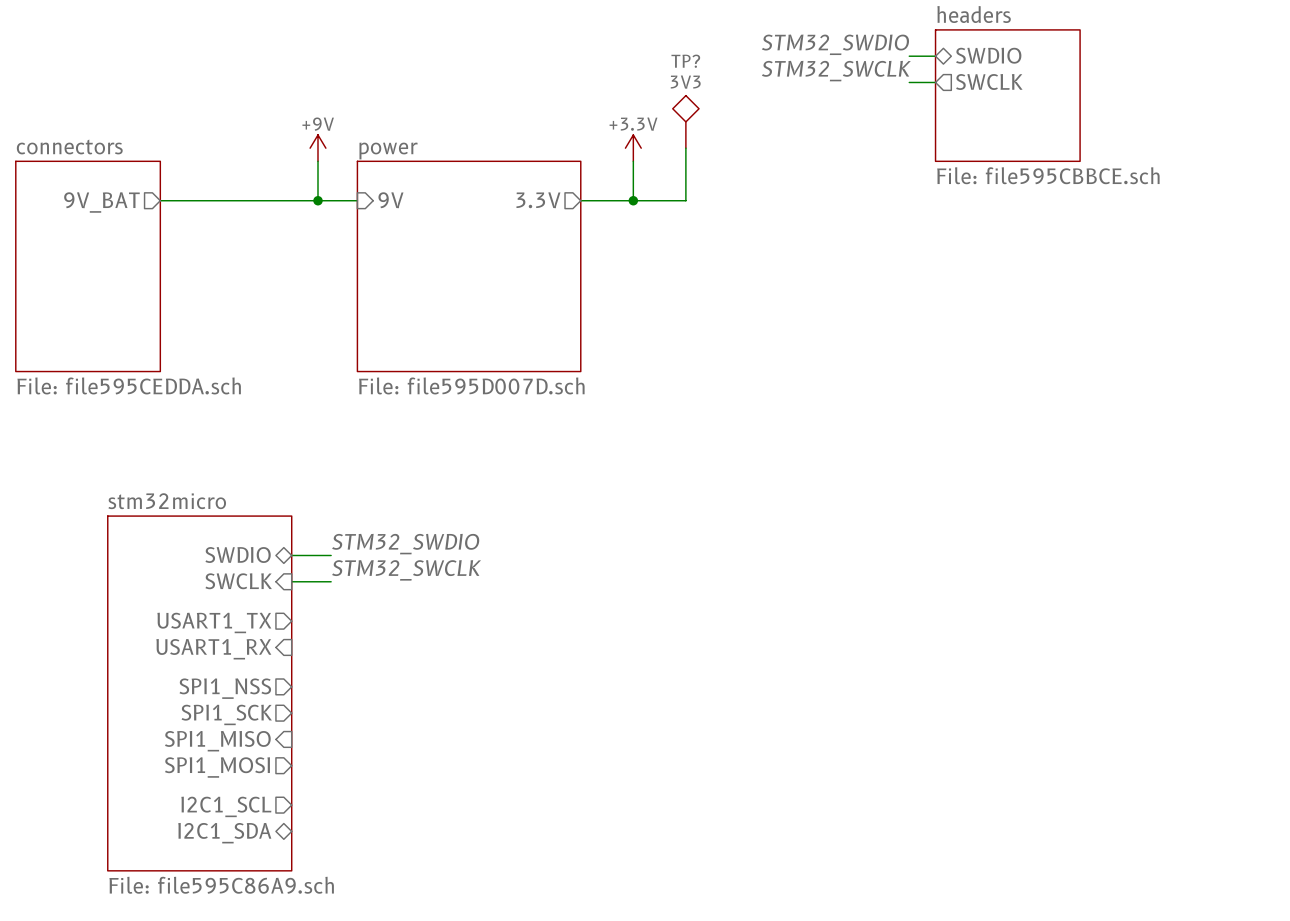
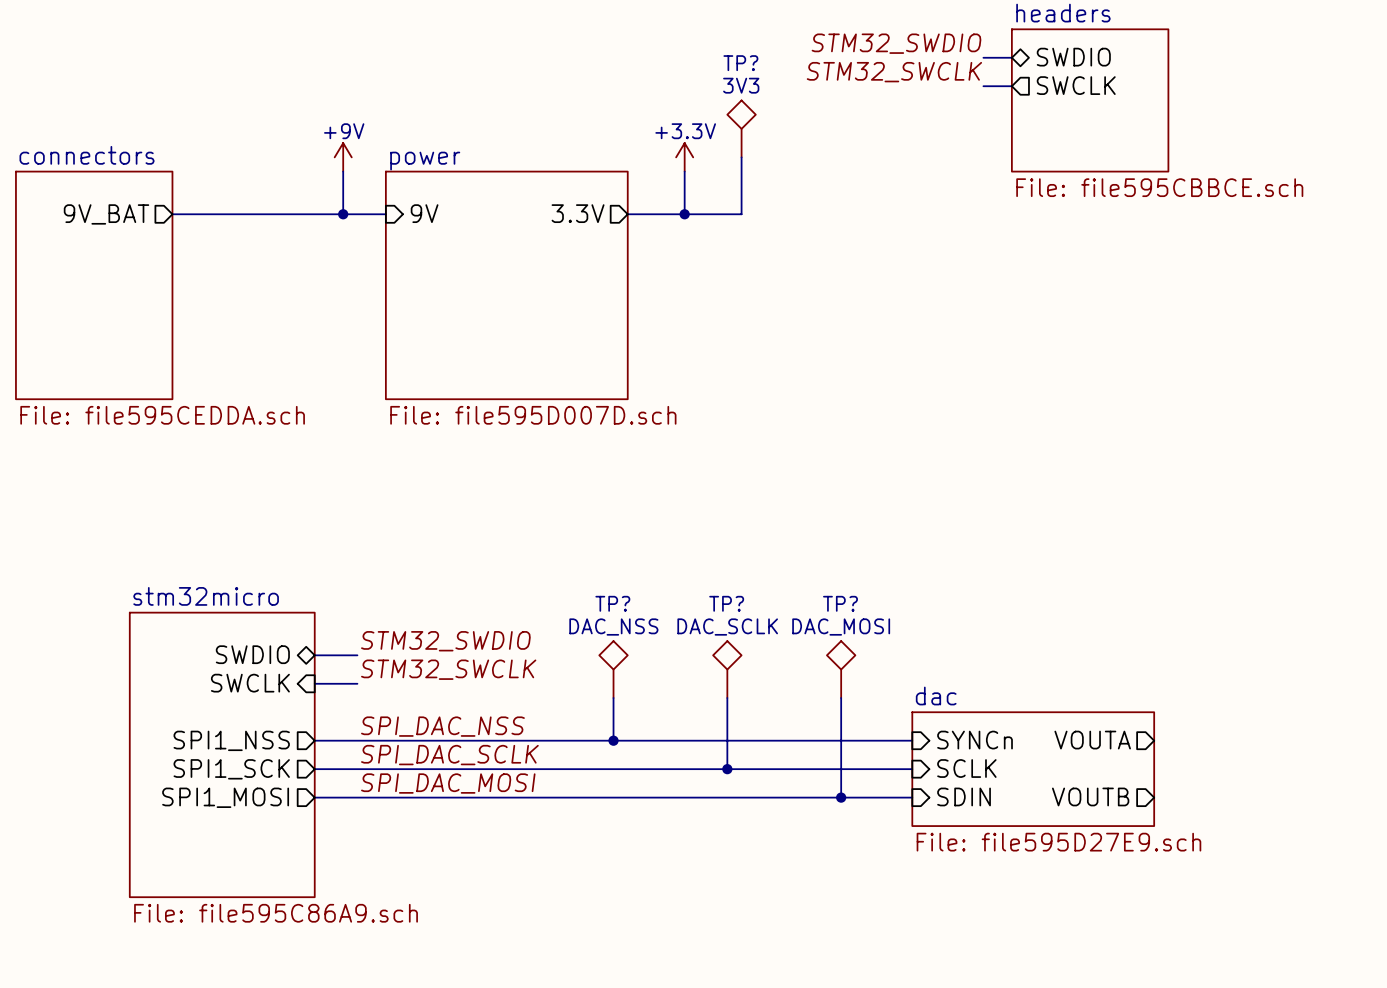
sheet stm32micro name position: stm32micro (167, 501) -> stm32micro (206, 596)
sheet stm32micro shape: [107, 516, 292, 871] -> [129, 612, 315, 898]
label position: STM32_SWDIO (405, 544) -> STM32_SWDIO (445, 641)
sheet pin position: SWDIO (238, 554) -> SWDIO (252, 654)
wire: (291, 555) (331, 555) -> (314, 655) (357, 655)
label position: STM32_SWCLK (406, 570) -> STM32_SWCLK (448, 669)
sheet pin position: SWCLK (238, 581) -> SWCLK (250, 683)
wire: (291, 581) (331, 581) -> (314, 683) (357, 683)
TP?: none -> DAC_NSS (613, 669)
TP?: none -> DAC_SCLK (727, 669)
TP?: none -> DAC_MOSI (841, 669)
sheet pin: USART1_TX (214, 622) -> none
wire: none -> (613, 698) (613, 740)
wire: none -> (727, 698) (727, 769)
wire: none -> (841, 698) (841, 797)
sheet pin: USART1_RX (213, 649) -> none
label: none -> SPI_DAC_NSS (442, 726)
wire: none -> (314, 740) (912, 740)
junction: none -> (613, 740)
sheet pin: none -> SYNCn (975, 740)
sheet pin: none -> VOUTA (1092, 740)
label: none -> SPI_DAC_SCLK (449, 755)
sheet pin: none -> SCLK (966, 768)
wire: none -> (314, 769) (912, 769)
junction: none -> (727, 769)
sheet dac: none -> File: file595D27E9.sch (1033, 769)
label: none -> SPI_DAC_MOSI (448, 783)
sheet pin: none -> SDIN (964, 796)
sheet pin: none -> VOUTB (1090, 796)
wire: none -> (314, 797) (912, 797)
junction: none -> (841, 797)
sheet pin shape: input (217, 741) -> output (225, 797)
sheet pin: SPI1_MISO (217, 741) -> SPI1_MOSI (225, 797)
sheet pin: SPI1_MOSI (217, 767) -> none
sheet pin: I2C1_SCL (226, 806) -> none
sheet pin: I2C1_SDA (224, 833) -> none
sheet stm32micro value position: File: file595C86A9.sch (221, 885) -> File: file595C86A9.sch (276, 913)

